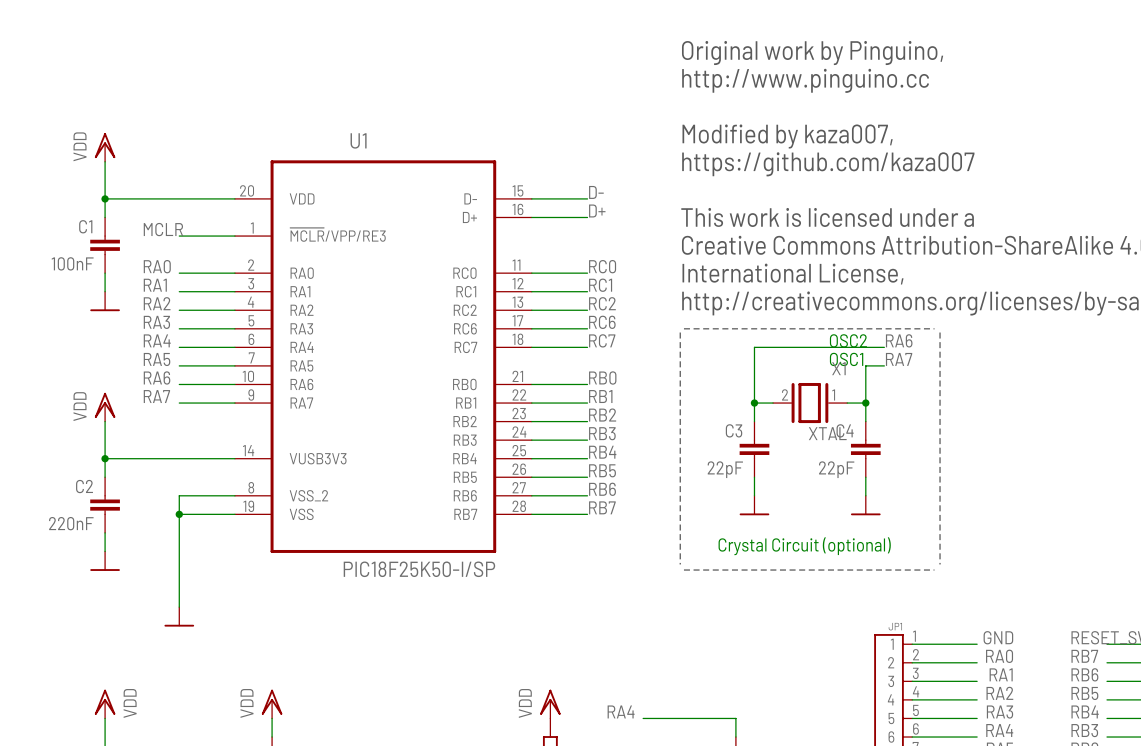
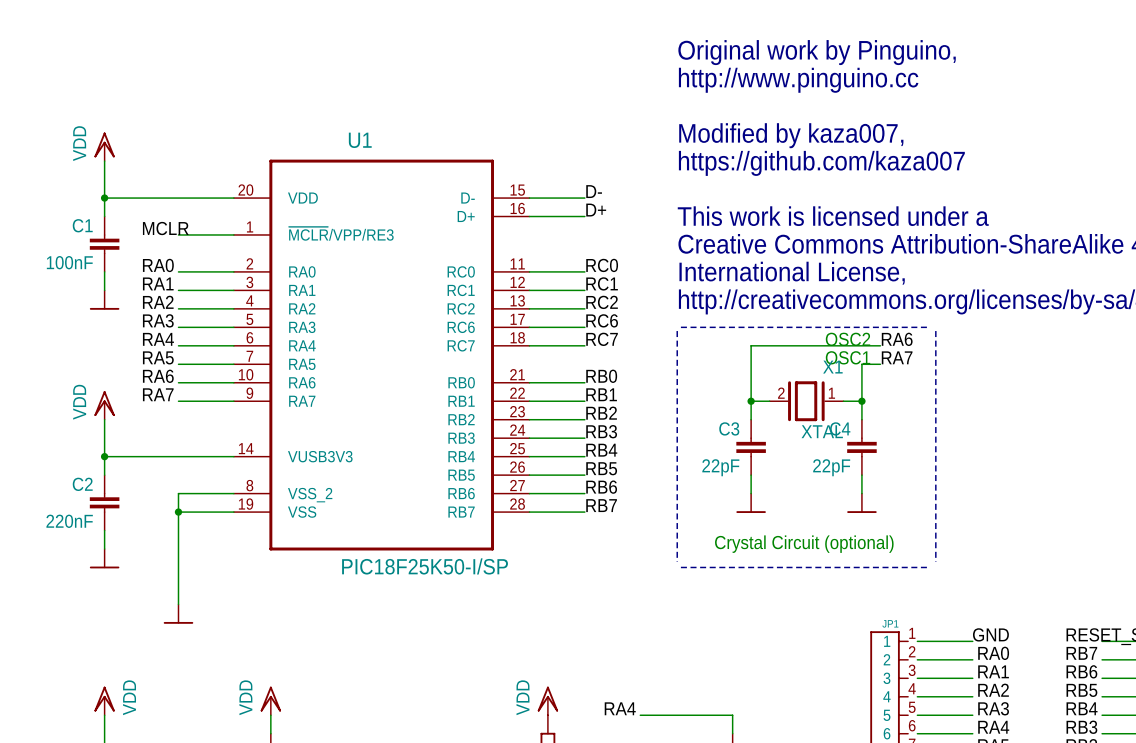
wire: (912, 644) (921, 644) -> none
wire: (912, 662) (921, 662) -> none
wire: (912, 681) (921, 681) -> none
wire: (912, 699) (921, 699) -> none
wire: (912, 718) (921, 718) -> none
wire: (912, 737) (921, 737) -> none

